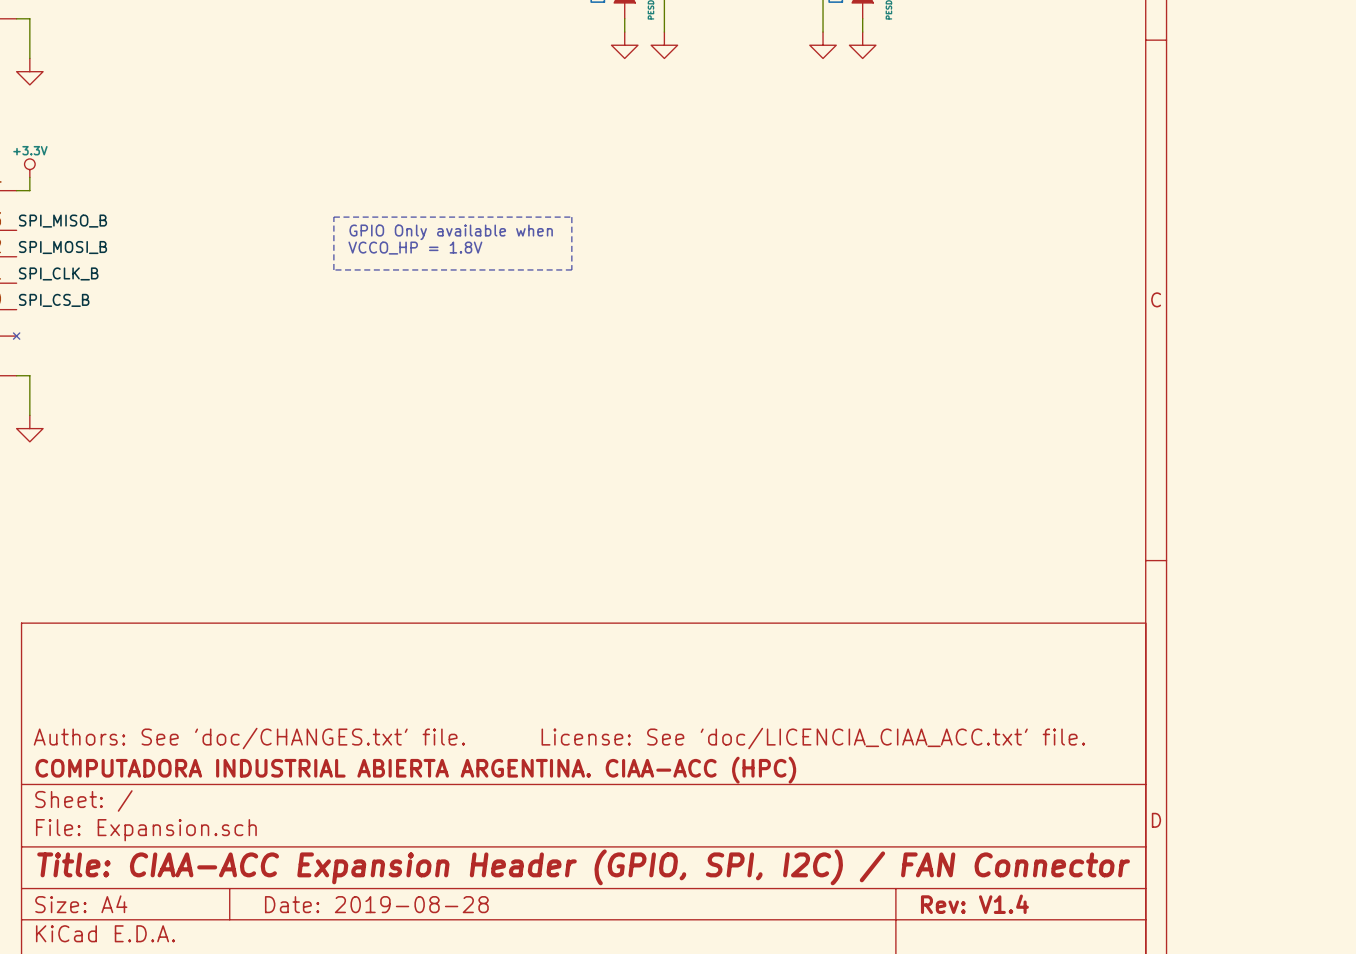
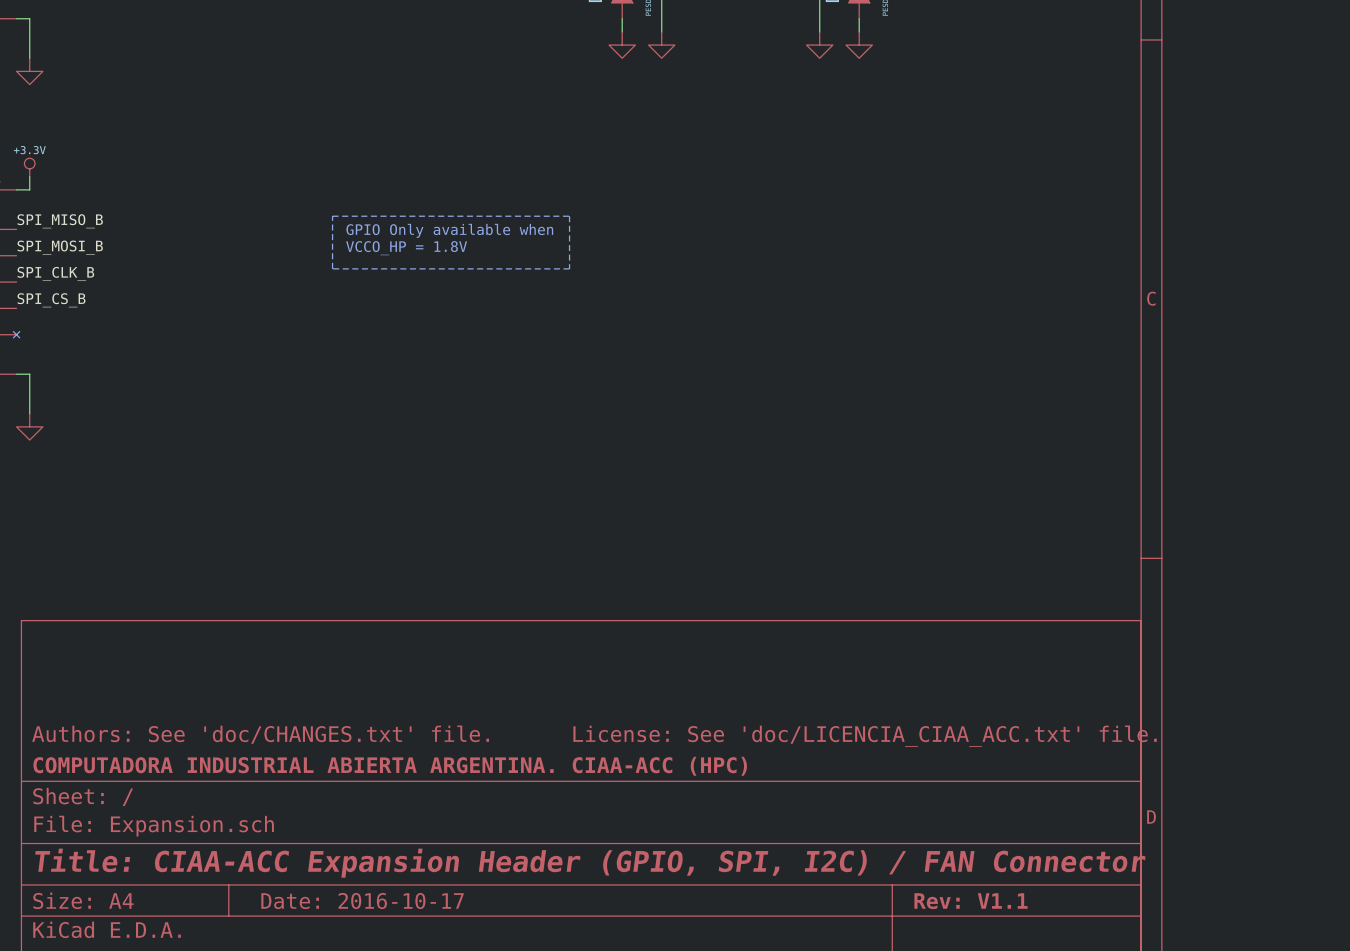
title block: Date: 2019-08-28 (376, 904) -> Date: 2016-10-17 (362, 901)
title block: Rev: V1.4 (974, 904) -> Rev: V1.1 (971, 901)

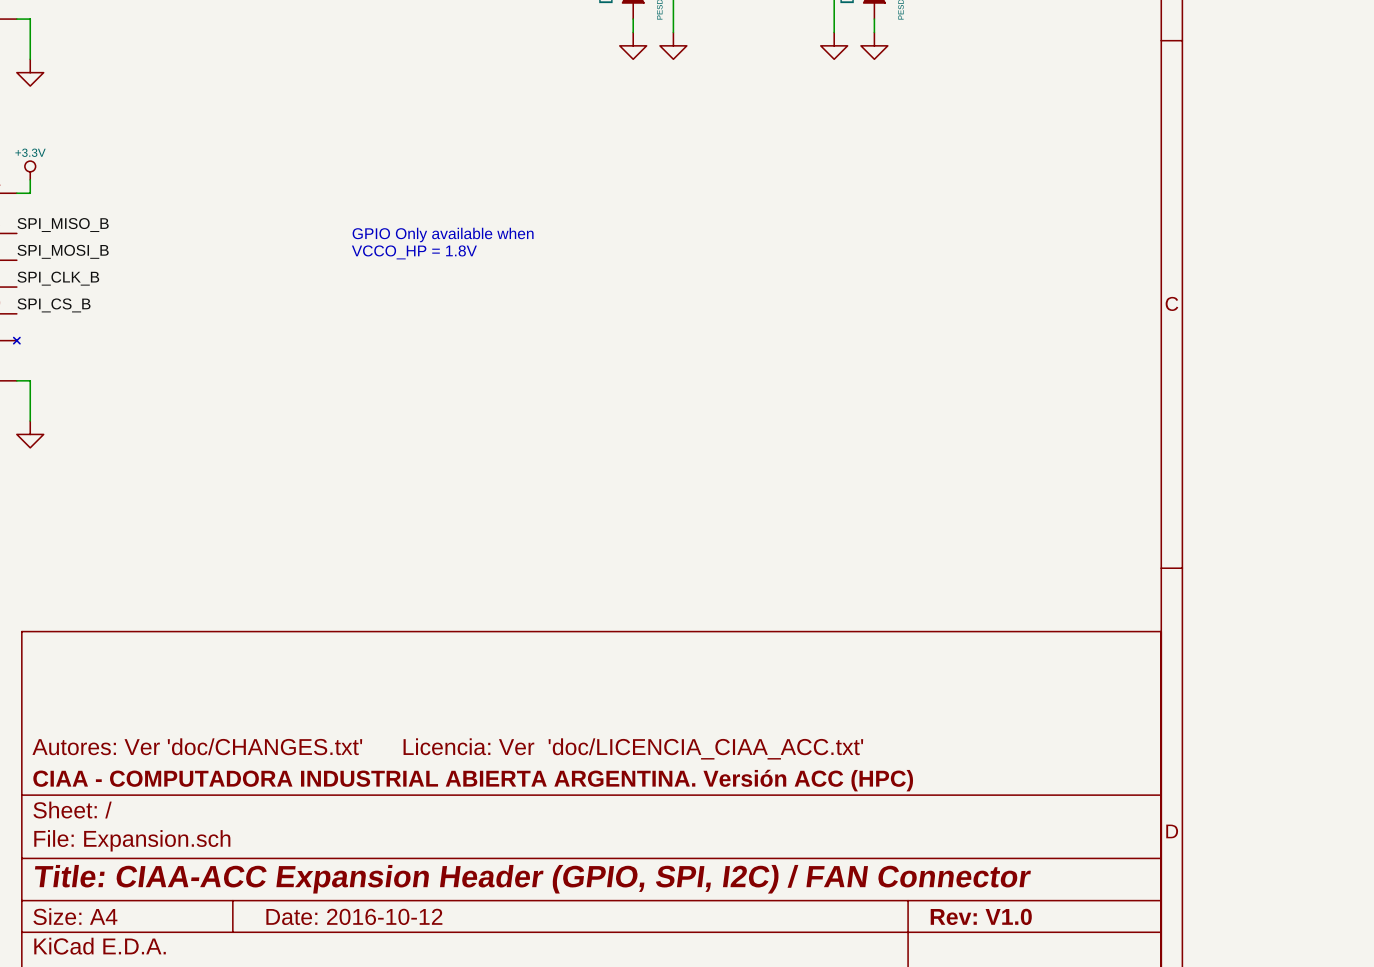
line: (332, 216) (569, 216) (569, 268) (332, 268) (332, 216) -> none
title block: Authors: See 'doc/CHANGES.txt' file. License: See 'doc/LICENCIA_CIAA_ACC.txt' file. (594, 736) -> Autores: Ver 'doc/CHANGES.txt' Licencia: Ver 'doc/LICENCIA_CIAA_ACC.txt' (447, 748)
title block: COMPUTADORA INDUSTRIAL ABIERTA ARGENTINA. CIAA-ACC (HPC) (390, 766) -> CIAA - COMPUTADORA INDUSTRIAL ABIERTA ARGENTINA. Versión ACC (HPC) (473, 780)
title block: Date: 2016-10-17 (362, 901) -> Date: 2016-10-12 (354, 916)
title block: Rev: V1.1 (971, 901) -> Rev: V1.0 (981, 916)

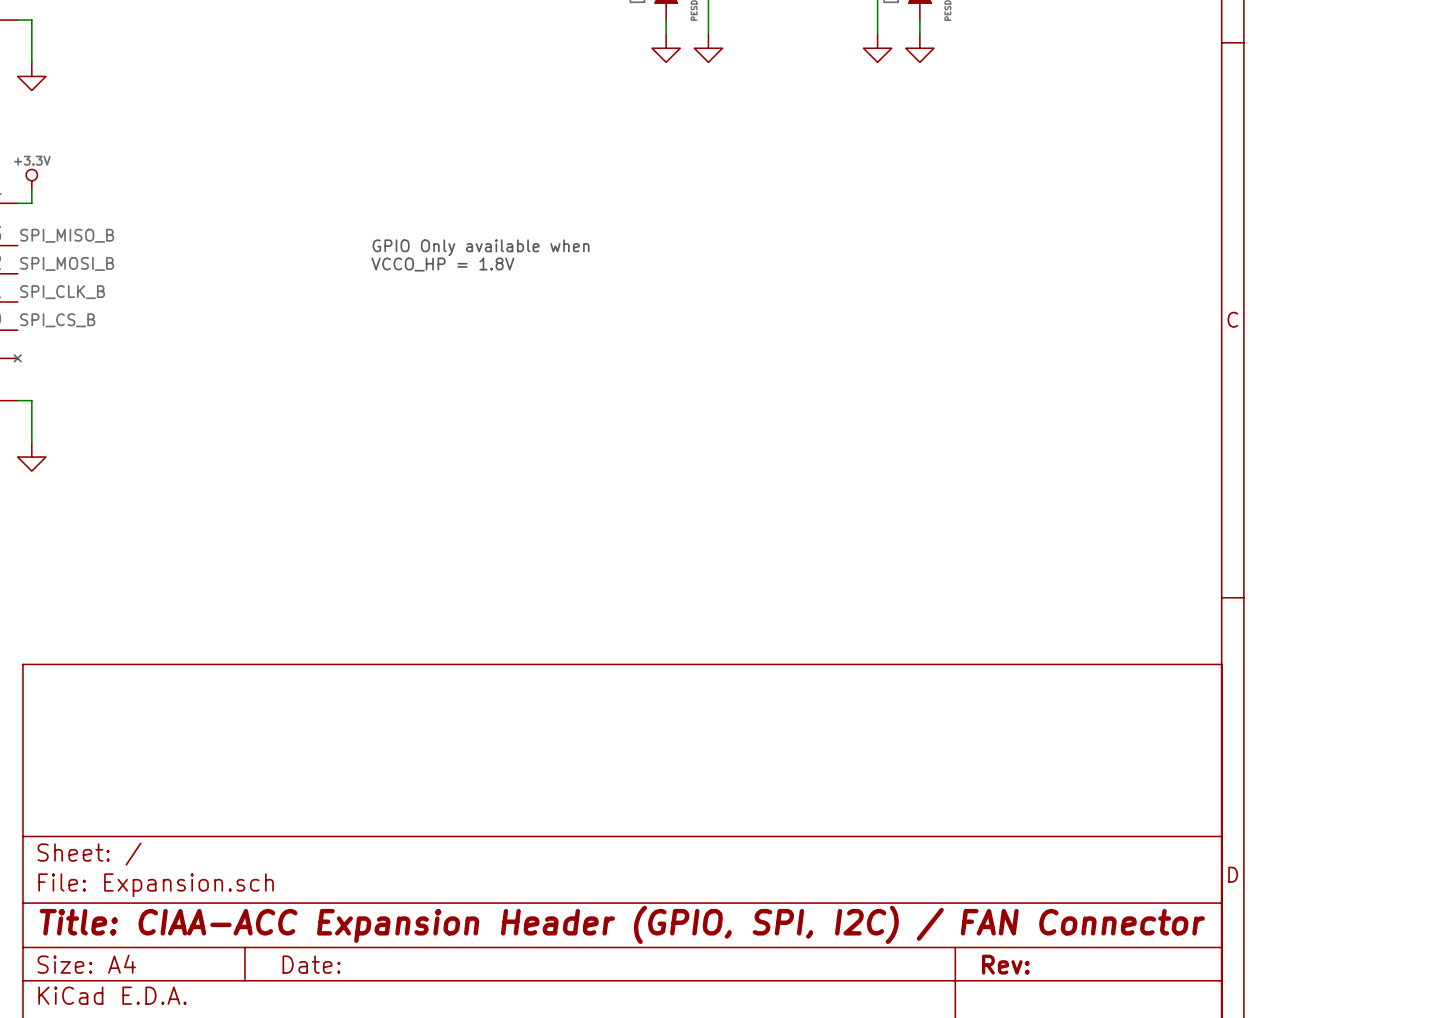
title block: Autores: Ver 'doc/CHANGES.txt' Licencia: Ver 'doc/LICENCIA_CIAA_ACC.txt' (447, 748) -> none
title block: CIAA - COMPUTADORA INDUSTRIAL ABIERTA ARGENTINA. Versión ACC (HPC) (473, 780) -> none
title block: Date: 2016-10-12 (354, 916) -> Date: (311, 964)
title block: Rev: V1.0 (981, 916) -> Rev: (1005, 964)

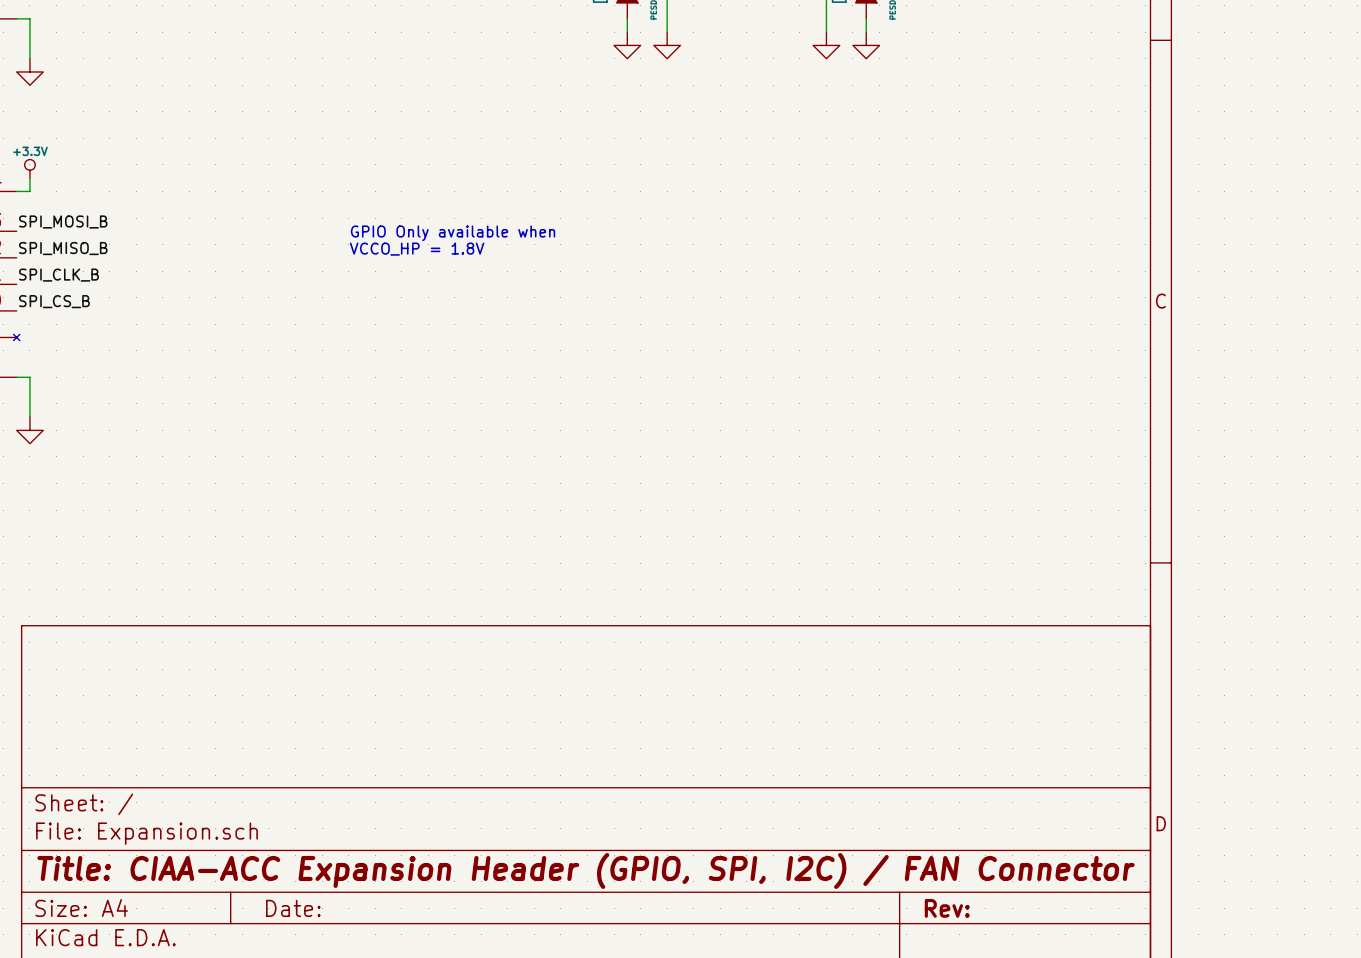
label: SPI_MISO_B (67, 235) -> SPI_MOSI_B (63, 221)
label: SPI_MOSI_B (67, 263) -> SPI_MISO_B (63, 248)

